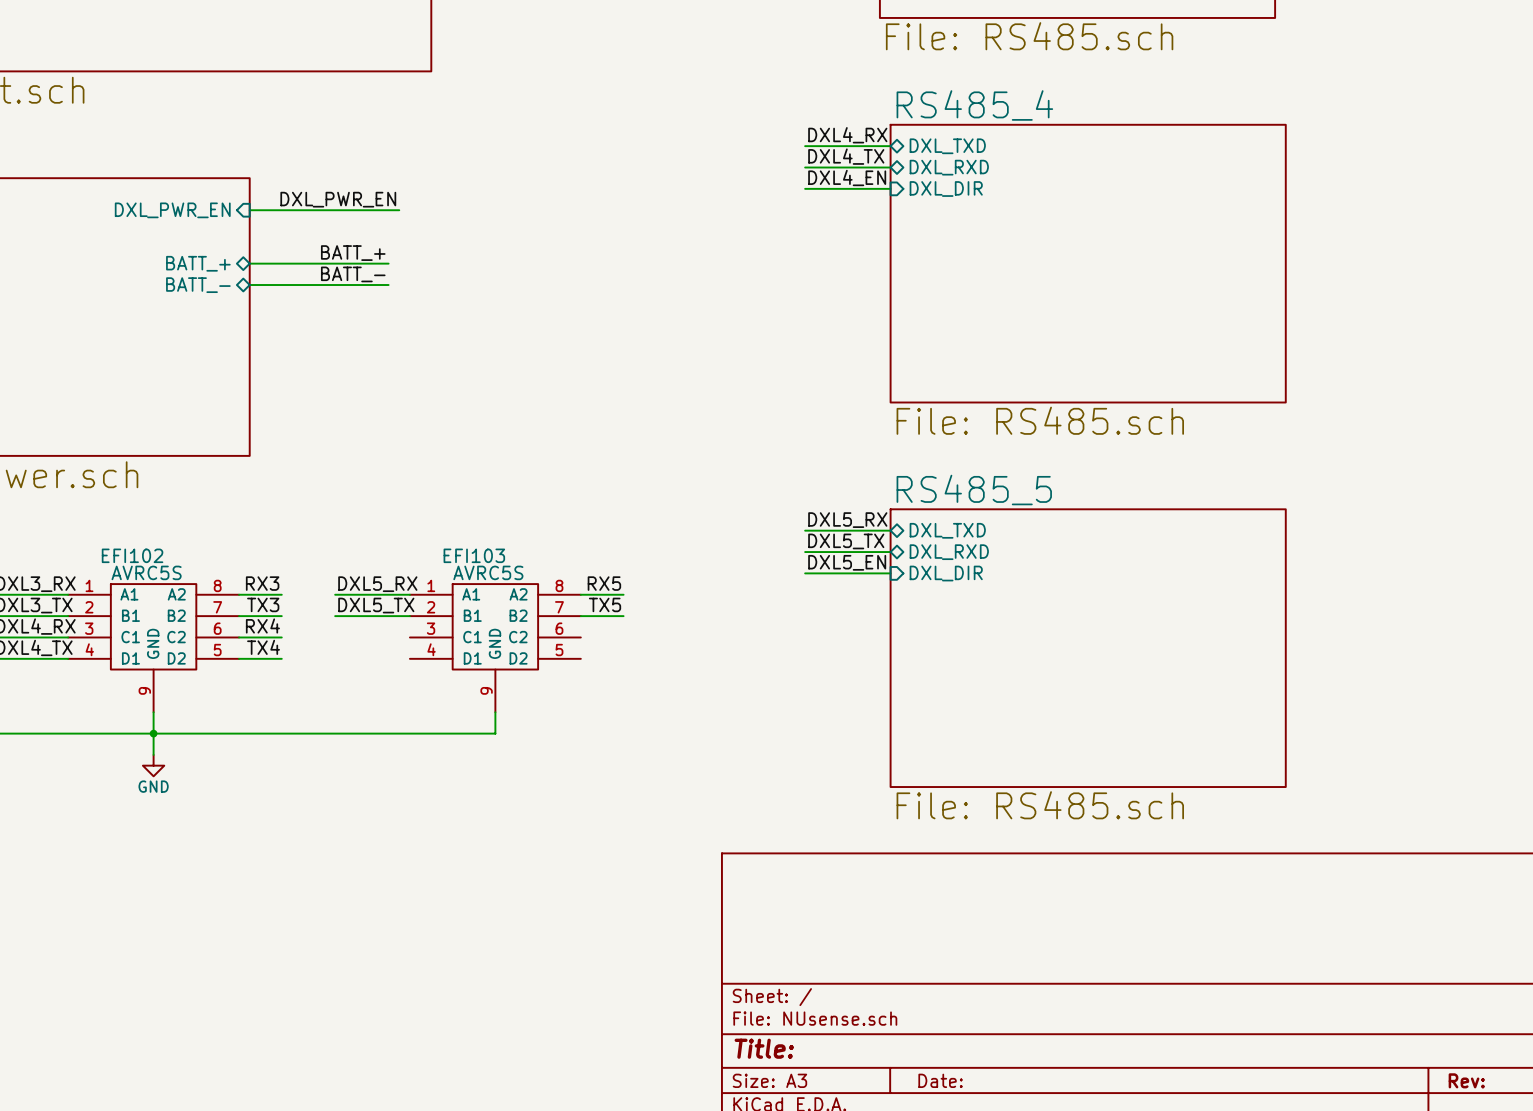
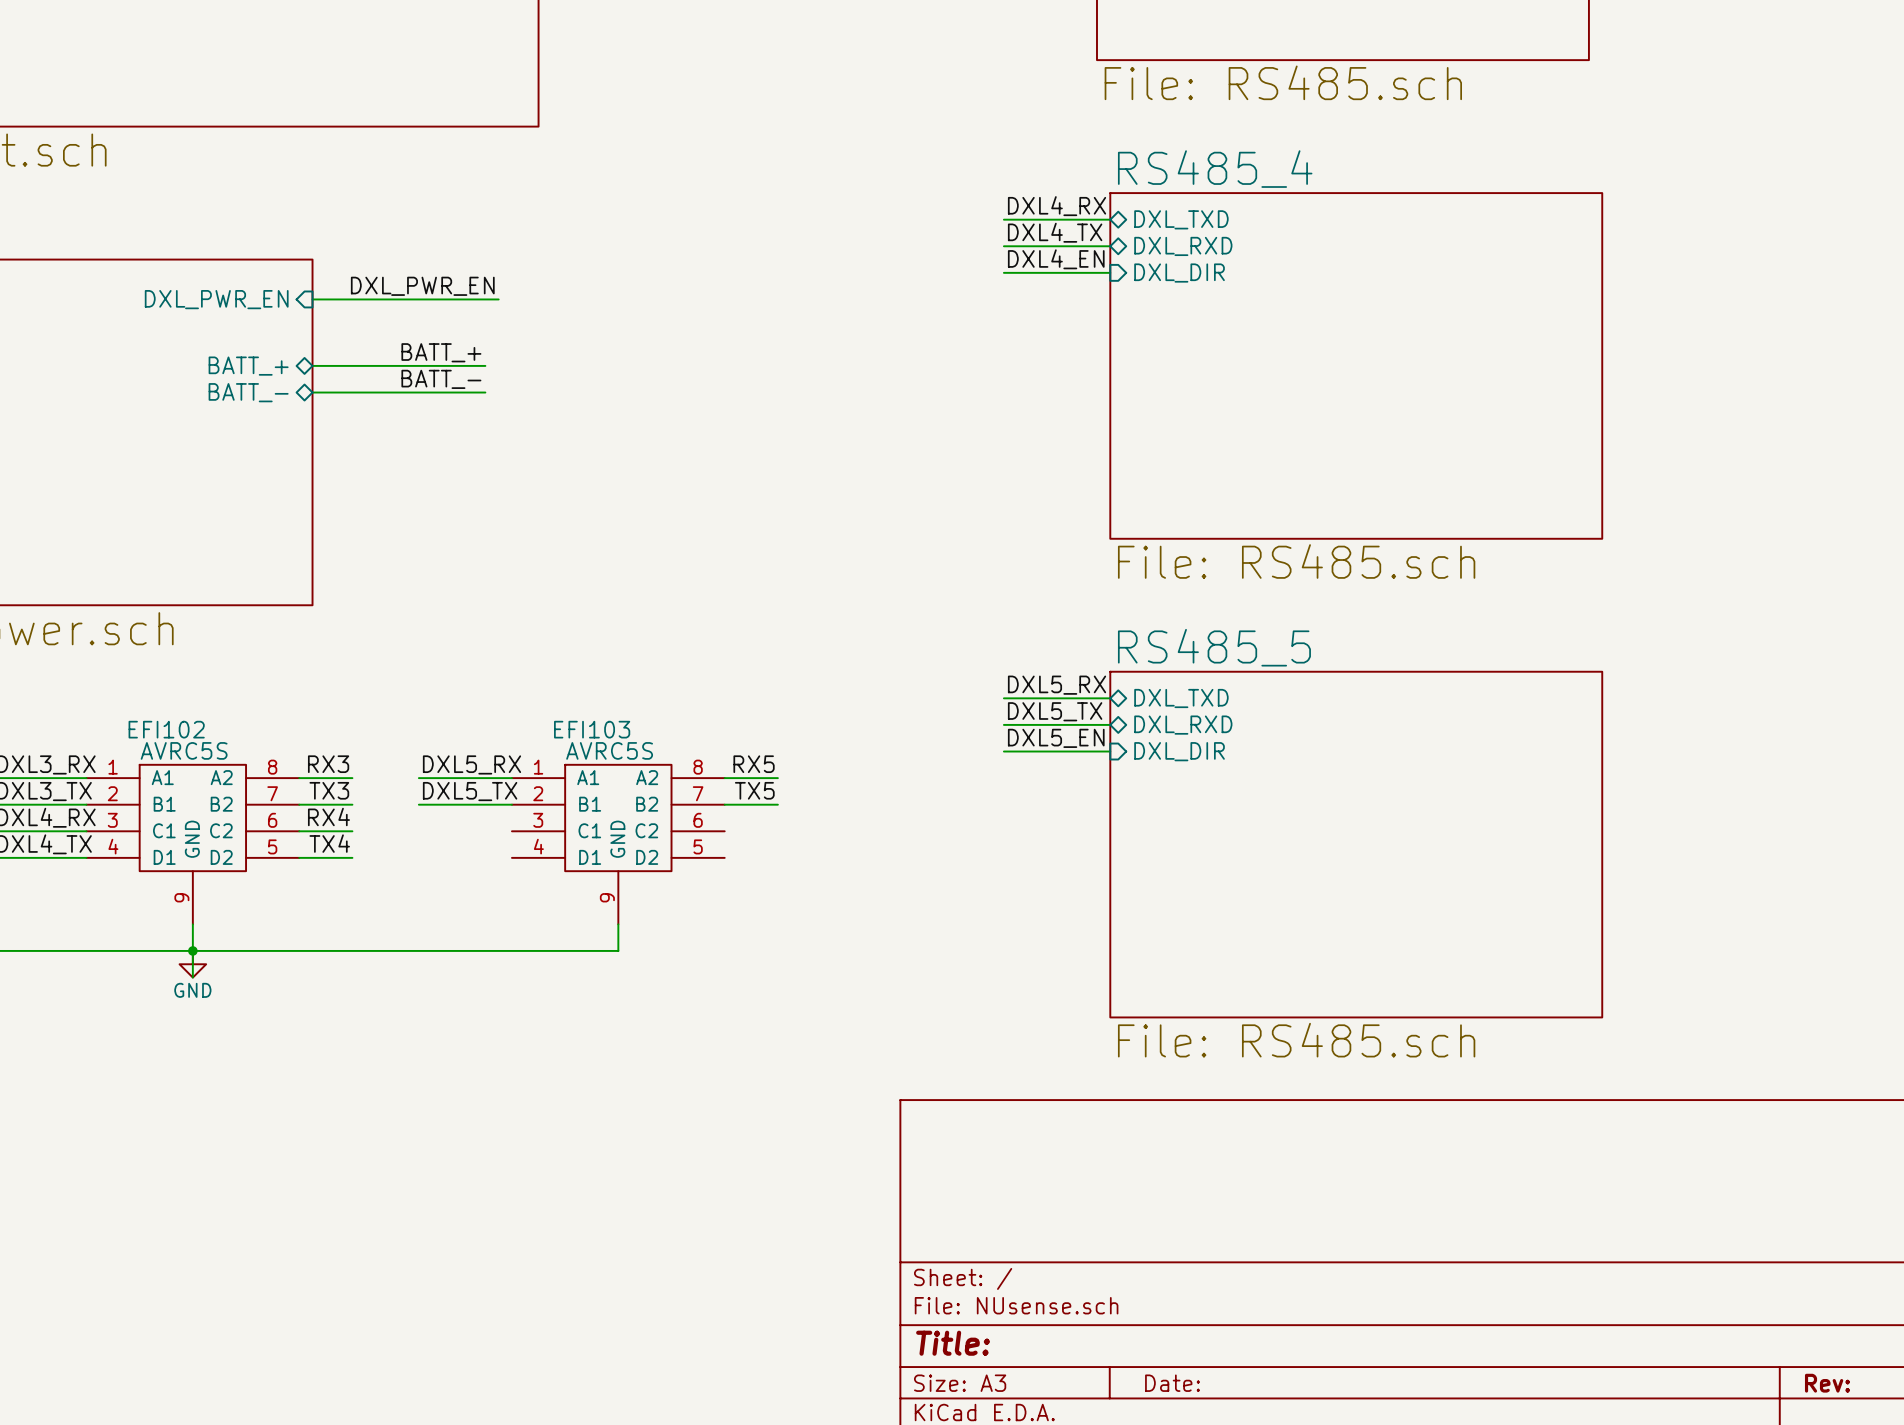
power symbol position: GND (153, 765) -> GND (192, 964)

